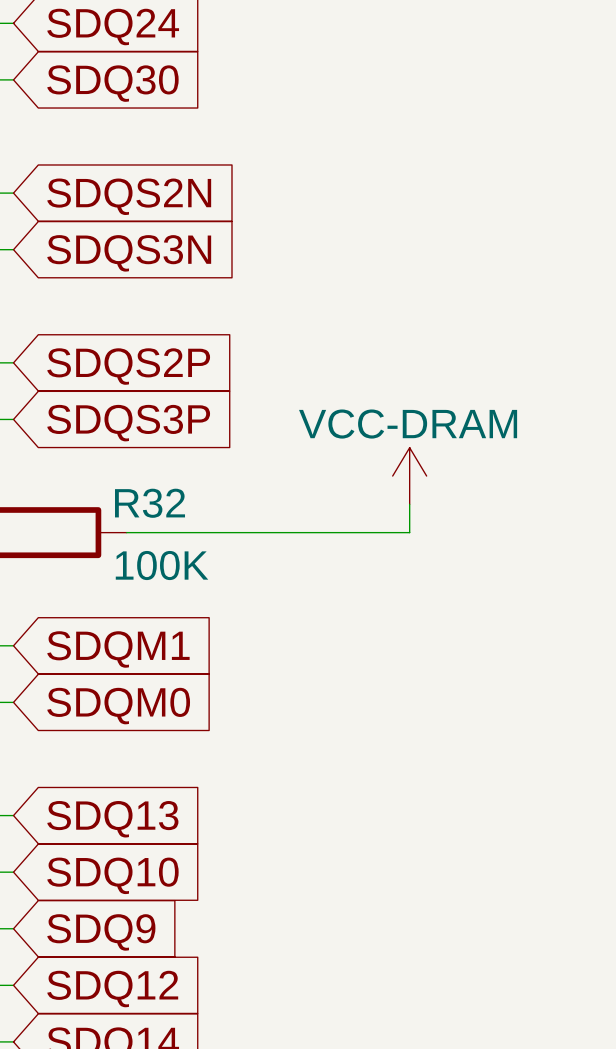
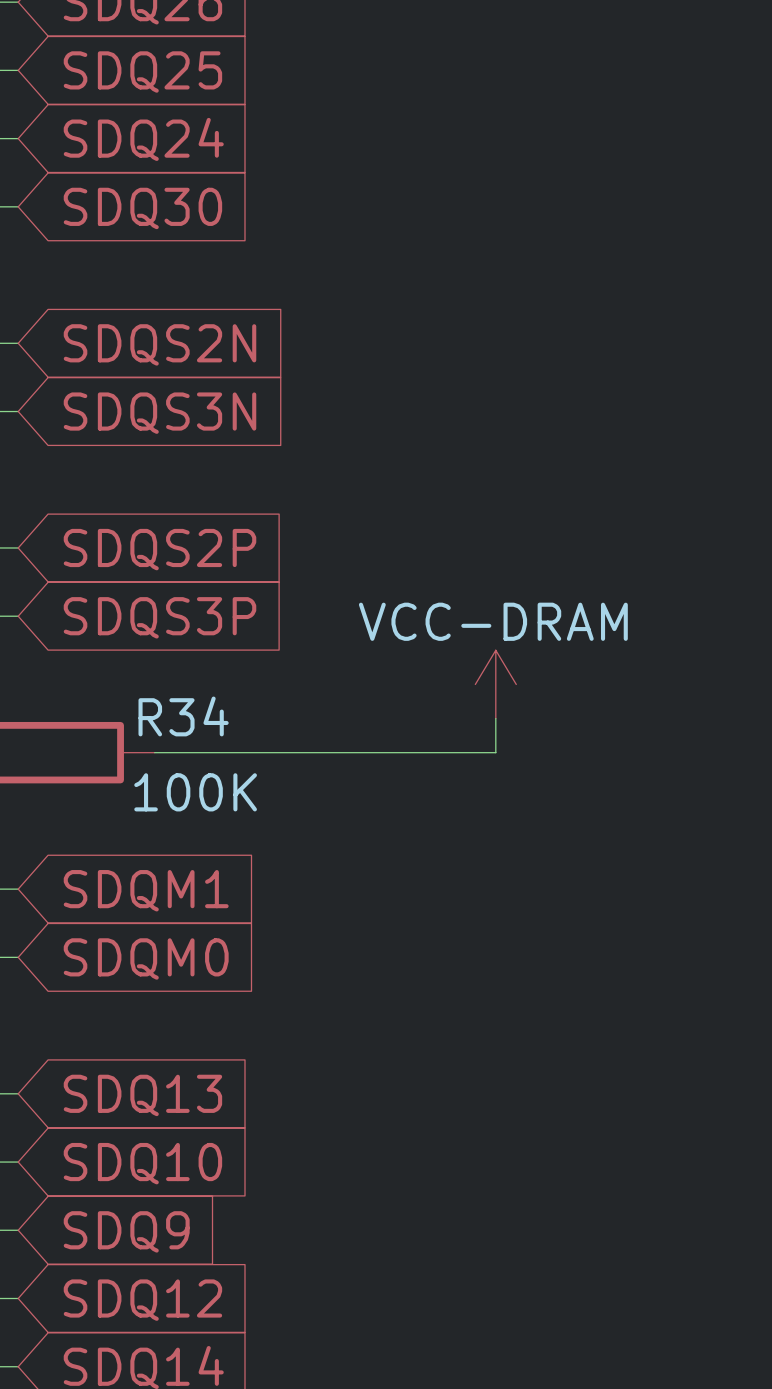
R32 name: R32 (150, 503) -> R34 (183, 716)

